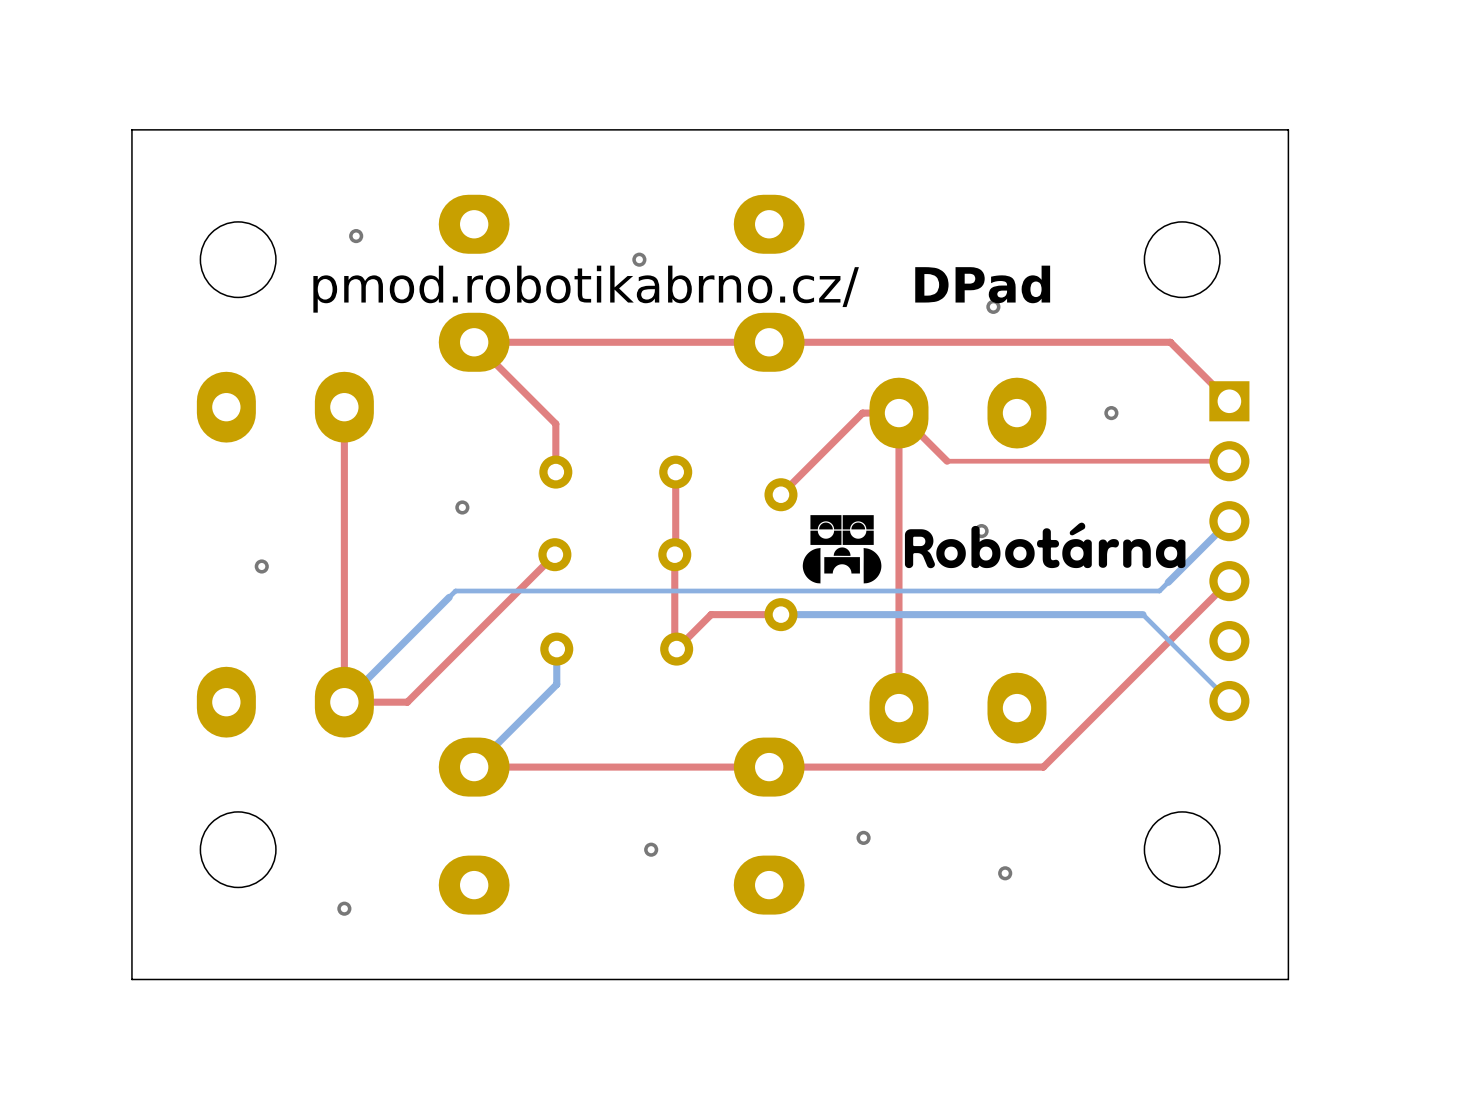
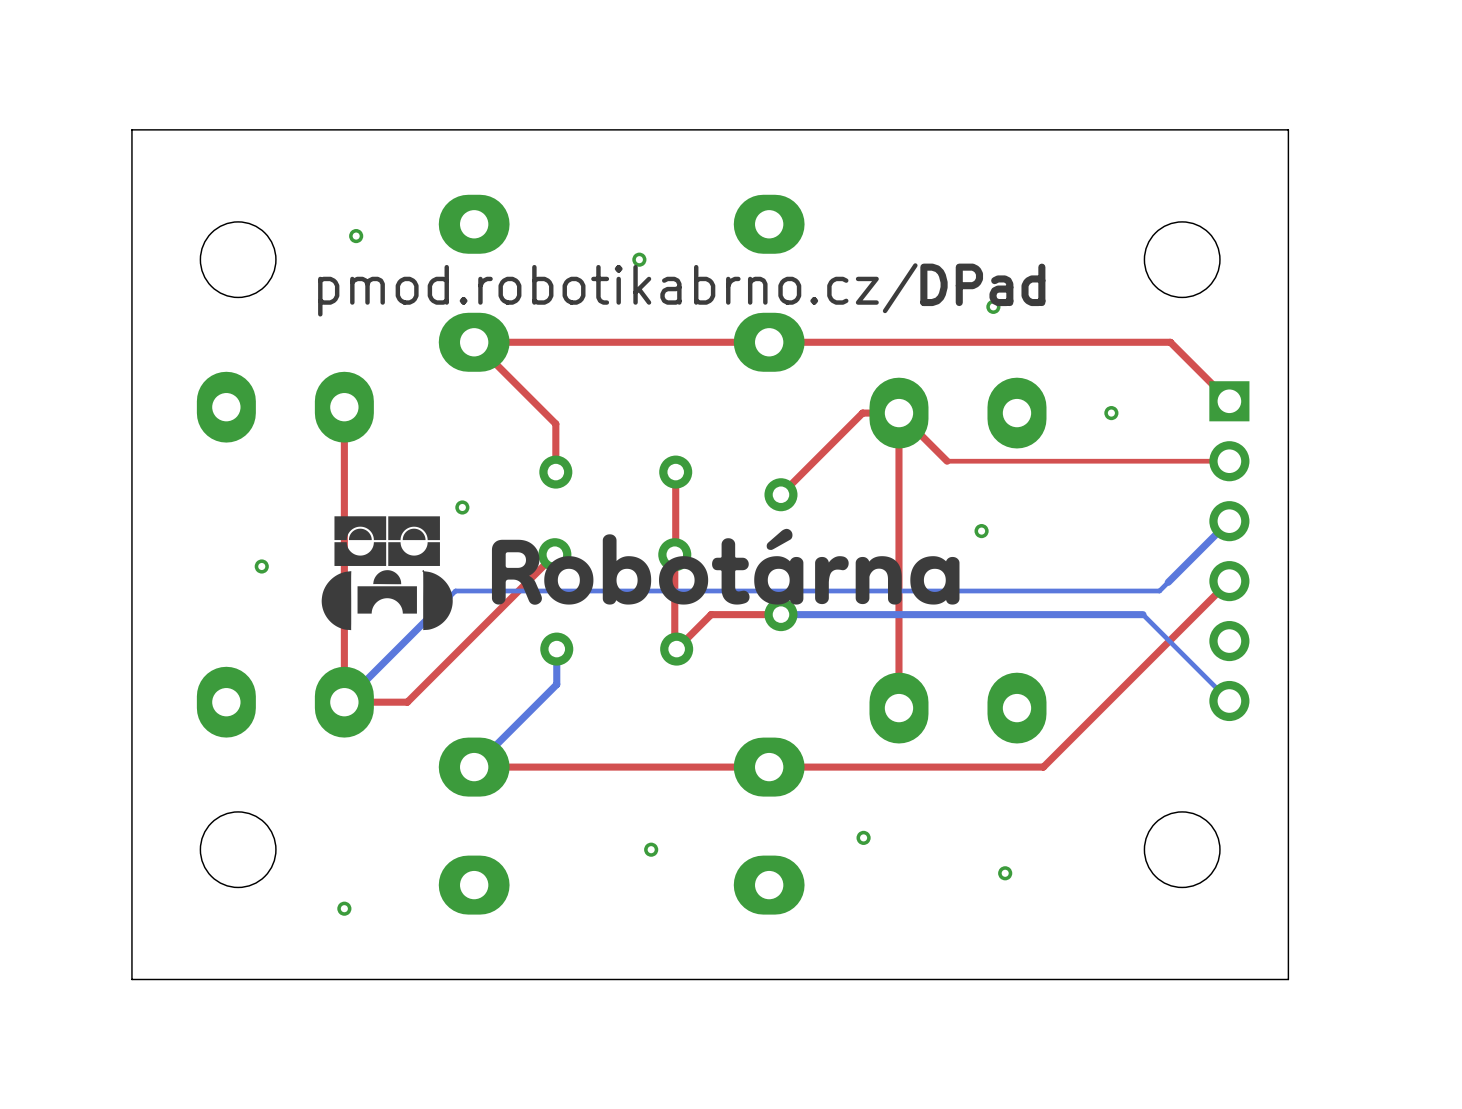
drawing: [802, 515, 874, 584] -> none
drawing: none -> [321, 516, 453, 631]
drawing: [904, 522, 1186, 569] -> none
drawing: none -> [491, 528, 849, 605]
drawing shape: [863, 548, 882, 584] -> [855, 556, 902, 605]
drawing: none -> [910, 556, 960, 605]

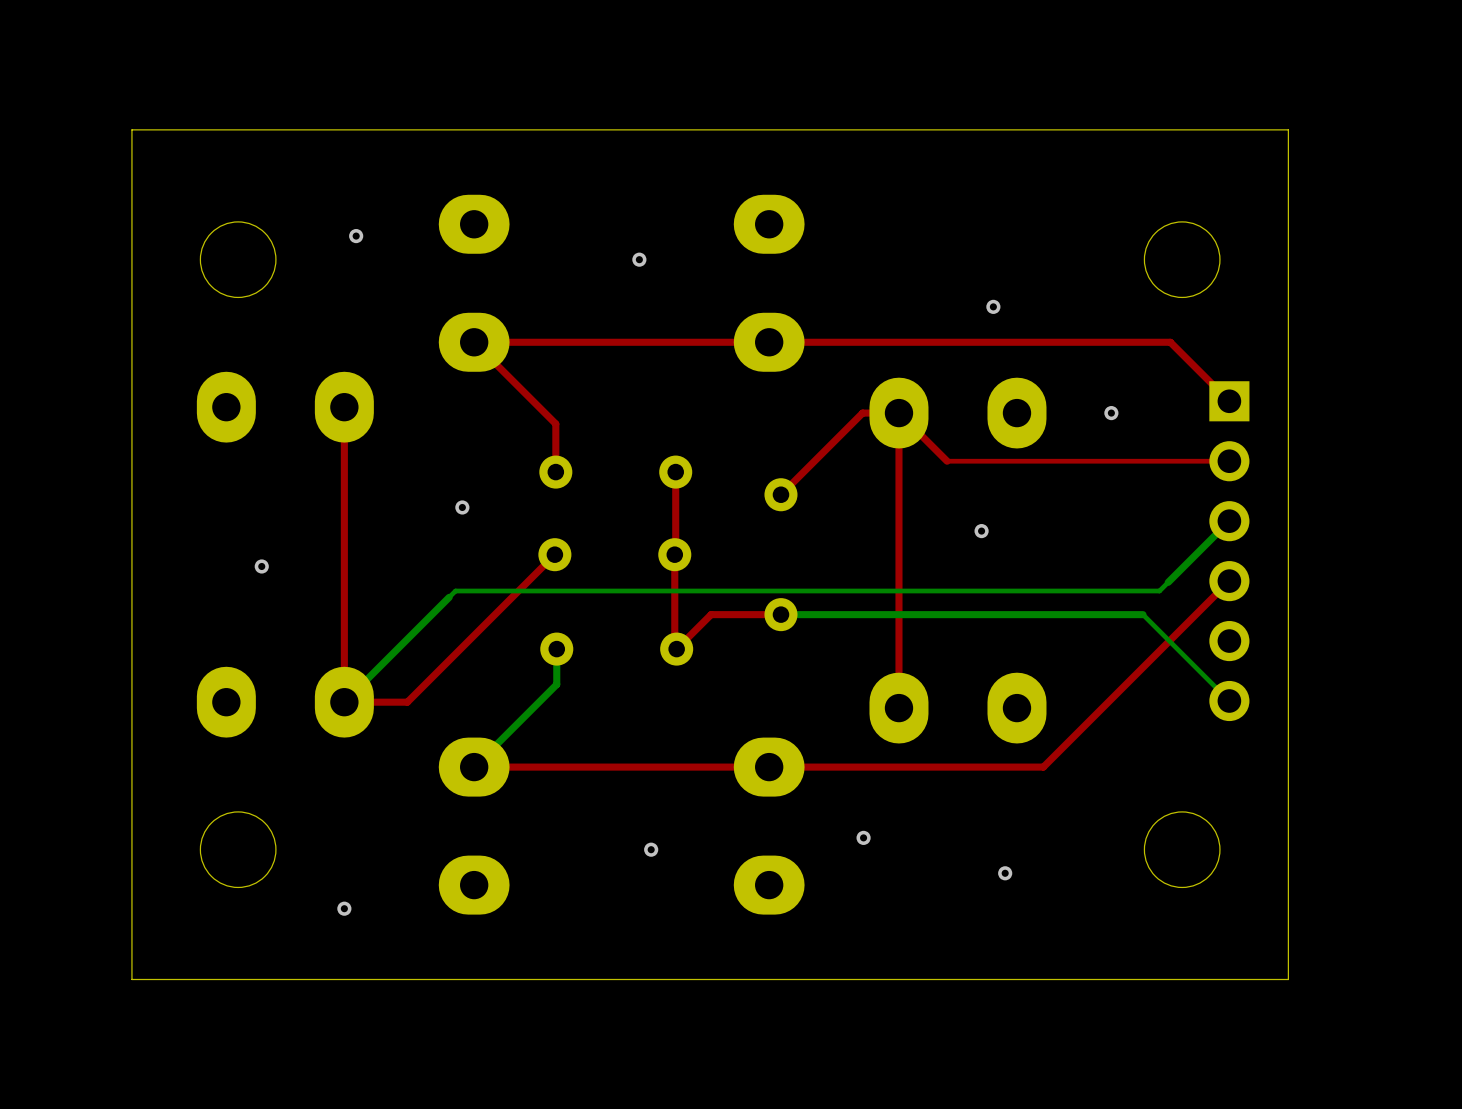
text: DPad (982, 284) -> none
text: pmod.robotikabrno.cz/ (617, 289) -> none
drawing: [321, 516, 453, 631] -> none
drawing: [491, 528, 960, 605] -> none

